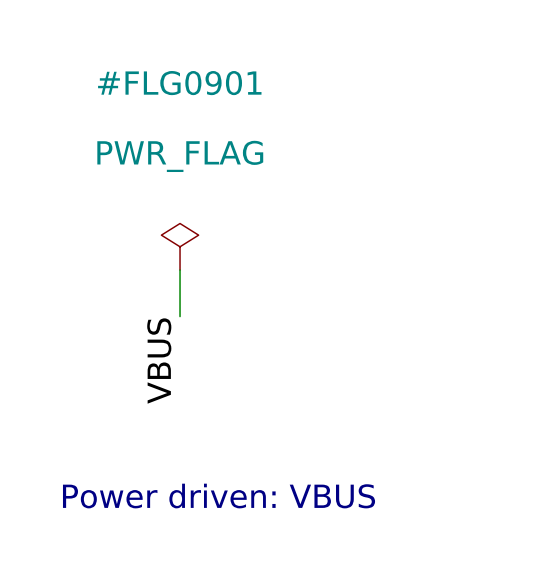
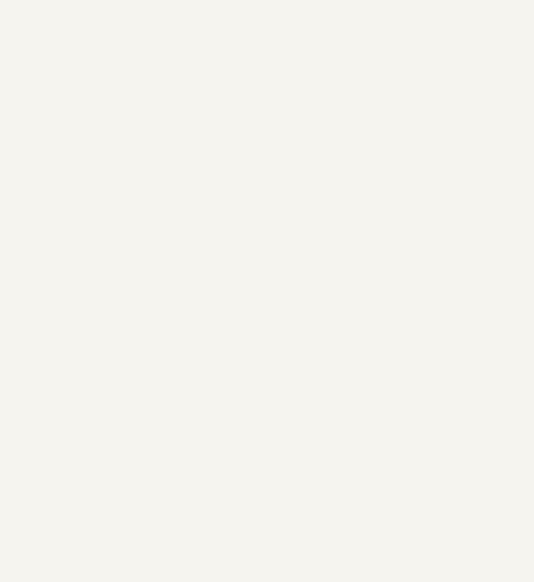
#FLG0901: PWR_FLAG (180, 246) -> none
wire: (180, 270) (180, 316) -> none
label: VBUS (159, 361) -> none
text: Power driven: VBUS (219, 496) -> none

